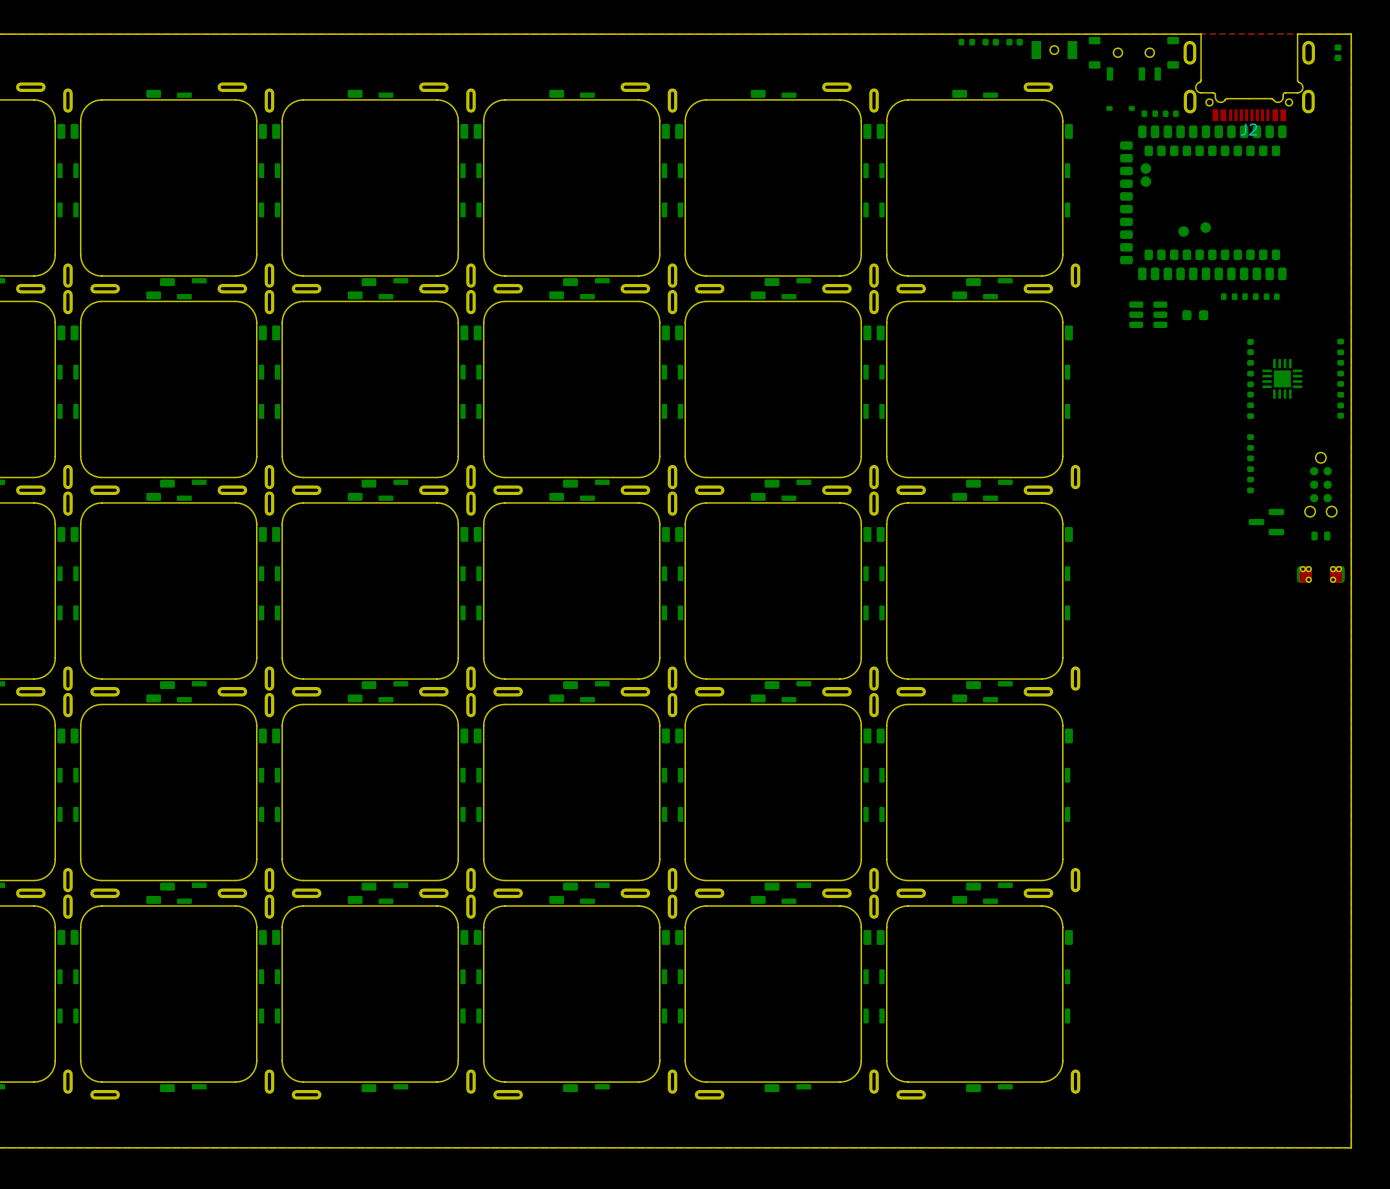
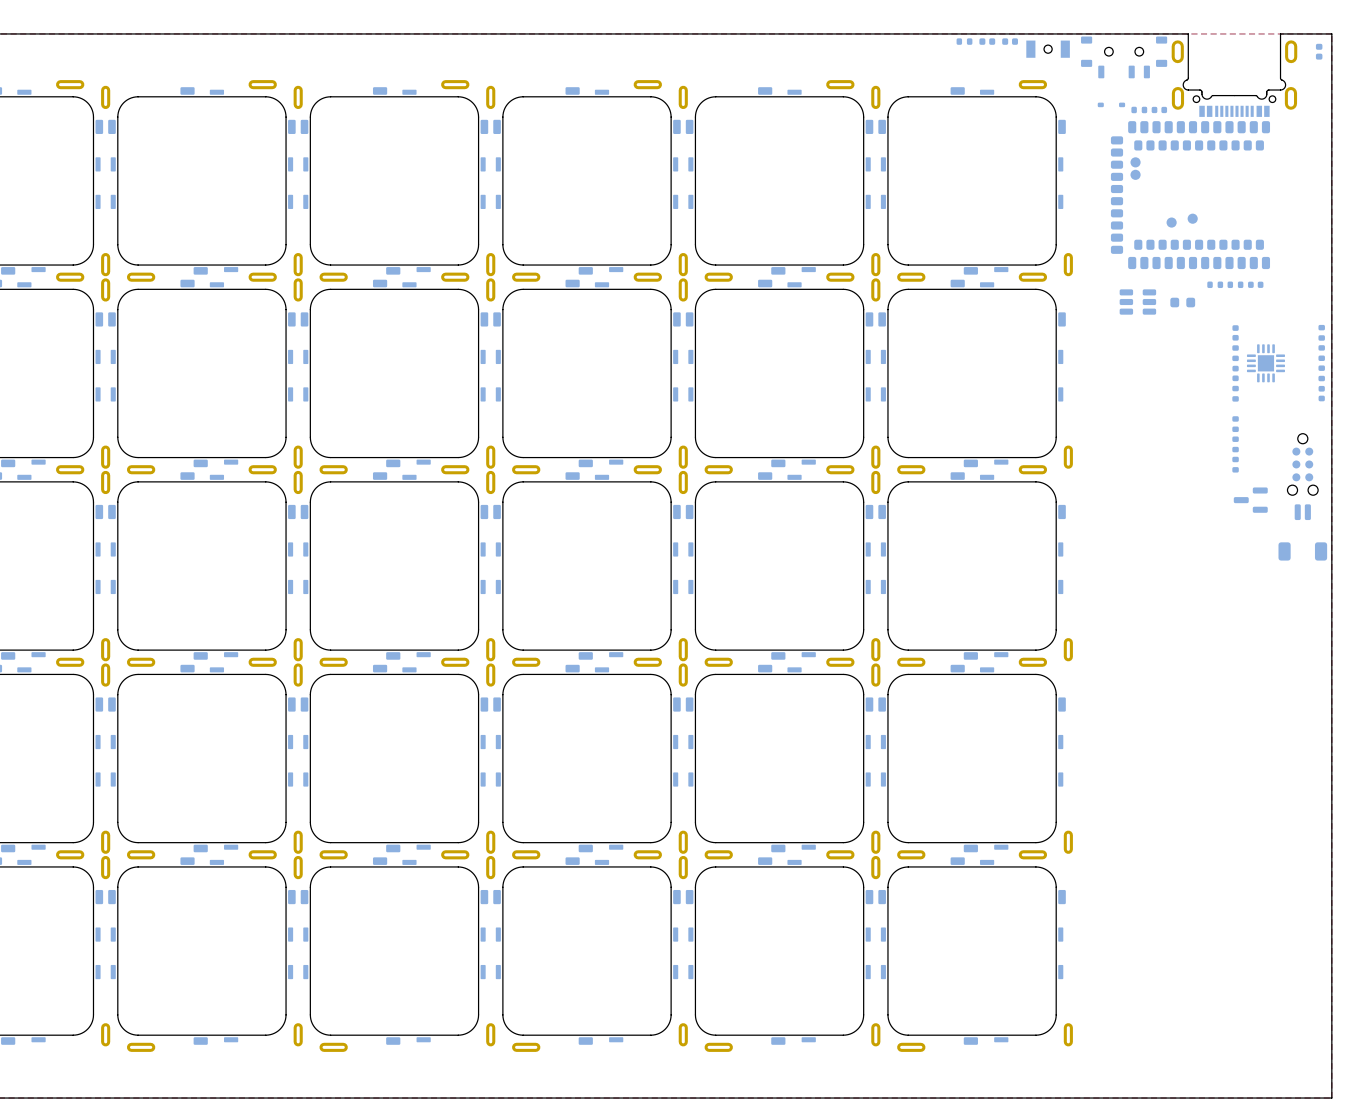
J2 side: top (1249, 77) -> bottom (1234, 75)
part footprint: [1297, 531, 1345, 583] -> [1278, 504, 1328, 561]

